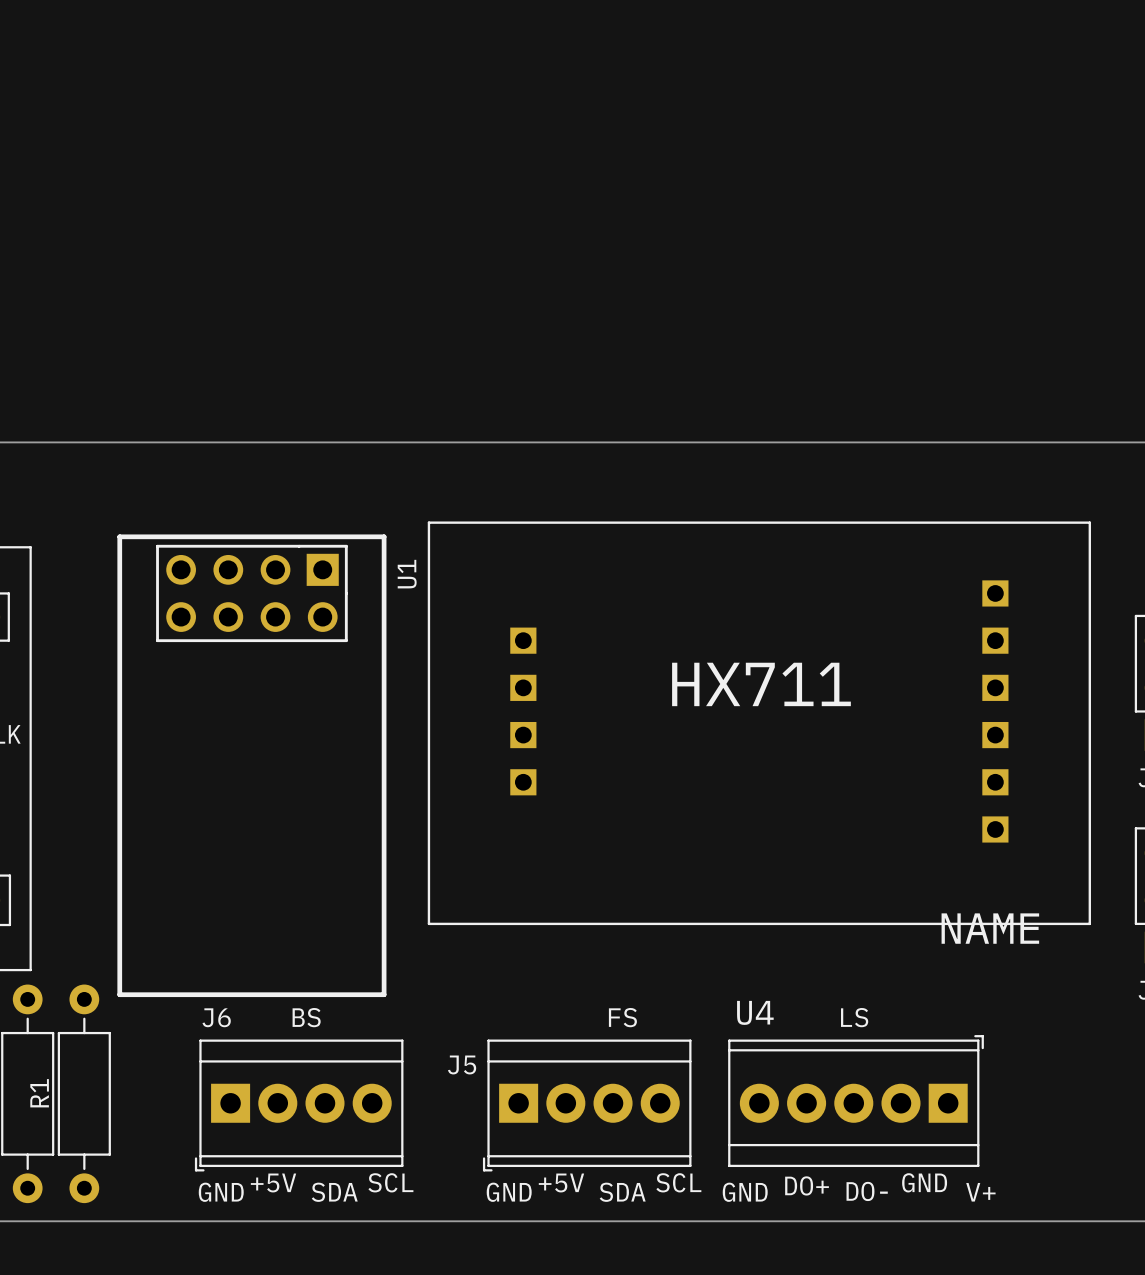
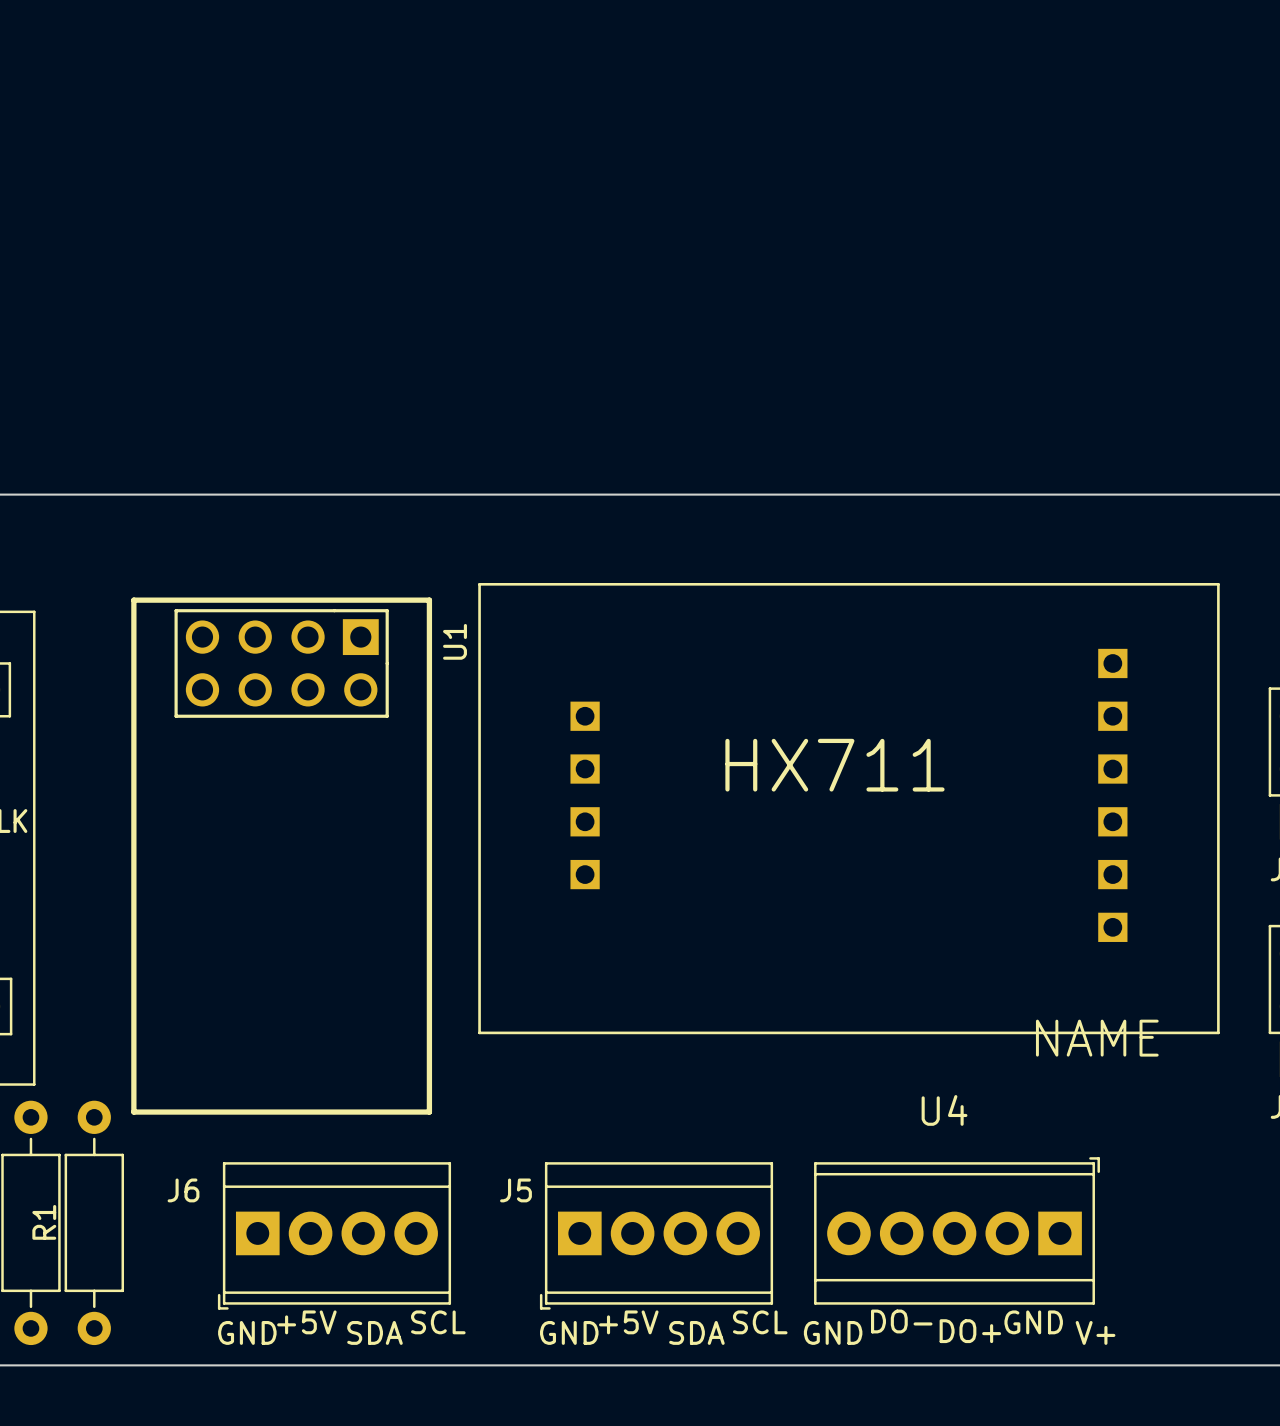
U4 name position: U4 (755, 1012) -> U4 (944, 1110)
J6 name position: J6 (216, 1017) -> J6 (183, 1190)
text: BS (306, 1017) -> none
text: FS (622, 1017) -> none
text: LS (854, 1017) -> none
text: DO+ (807, 1185) -> DO- (901, 1321)
text: DO- (867, 1191) -> DO+ (970, 1331)

